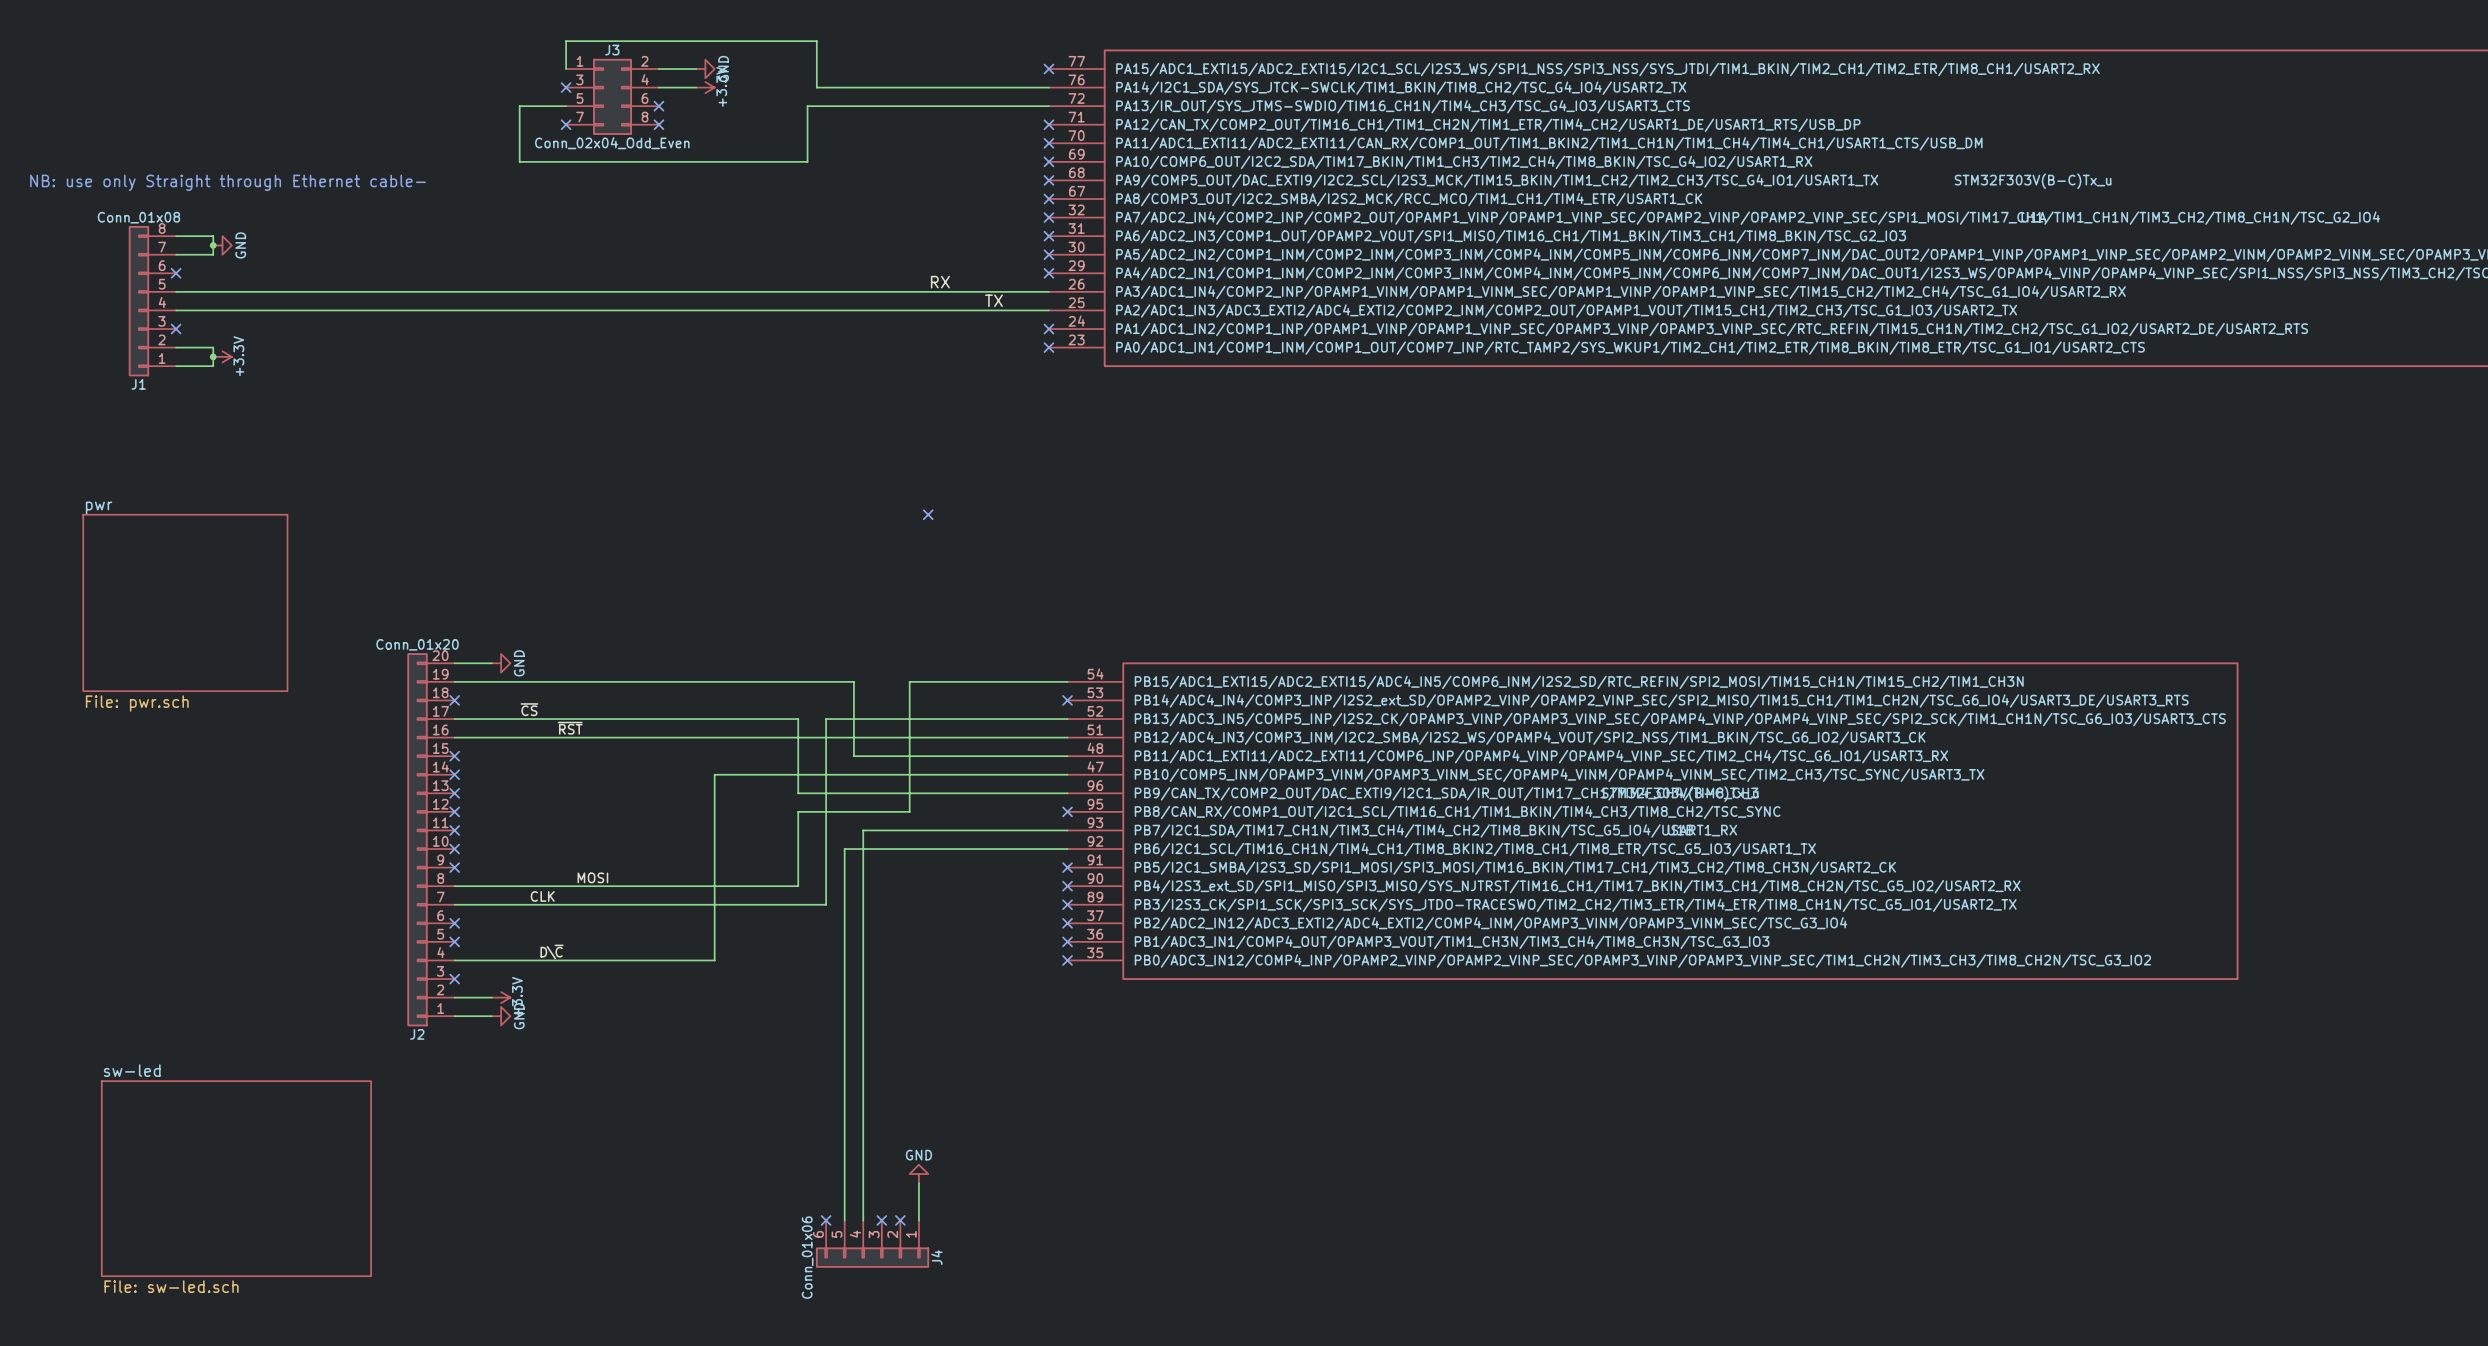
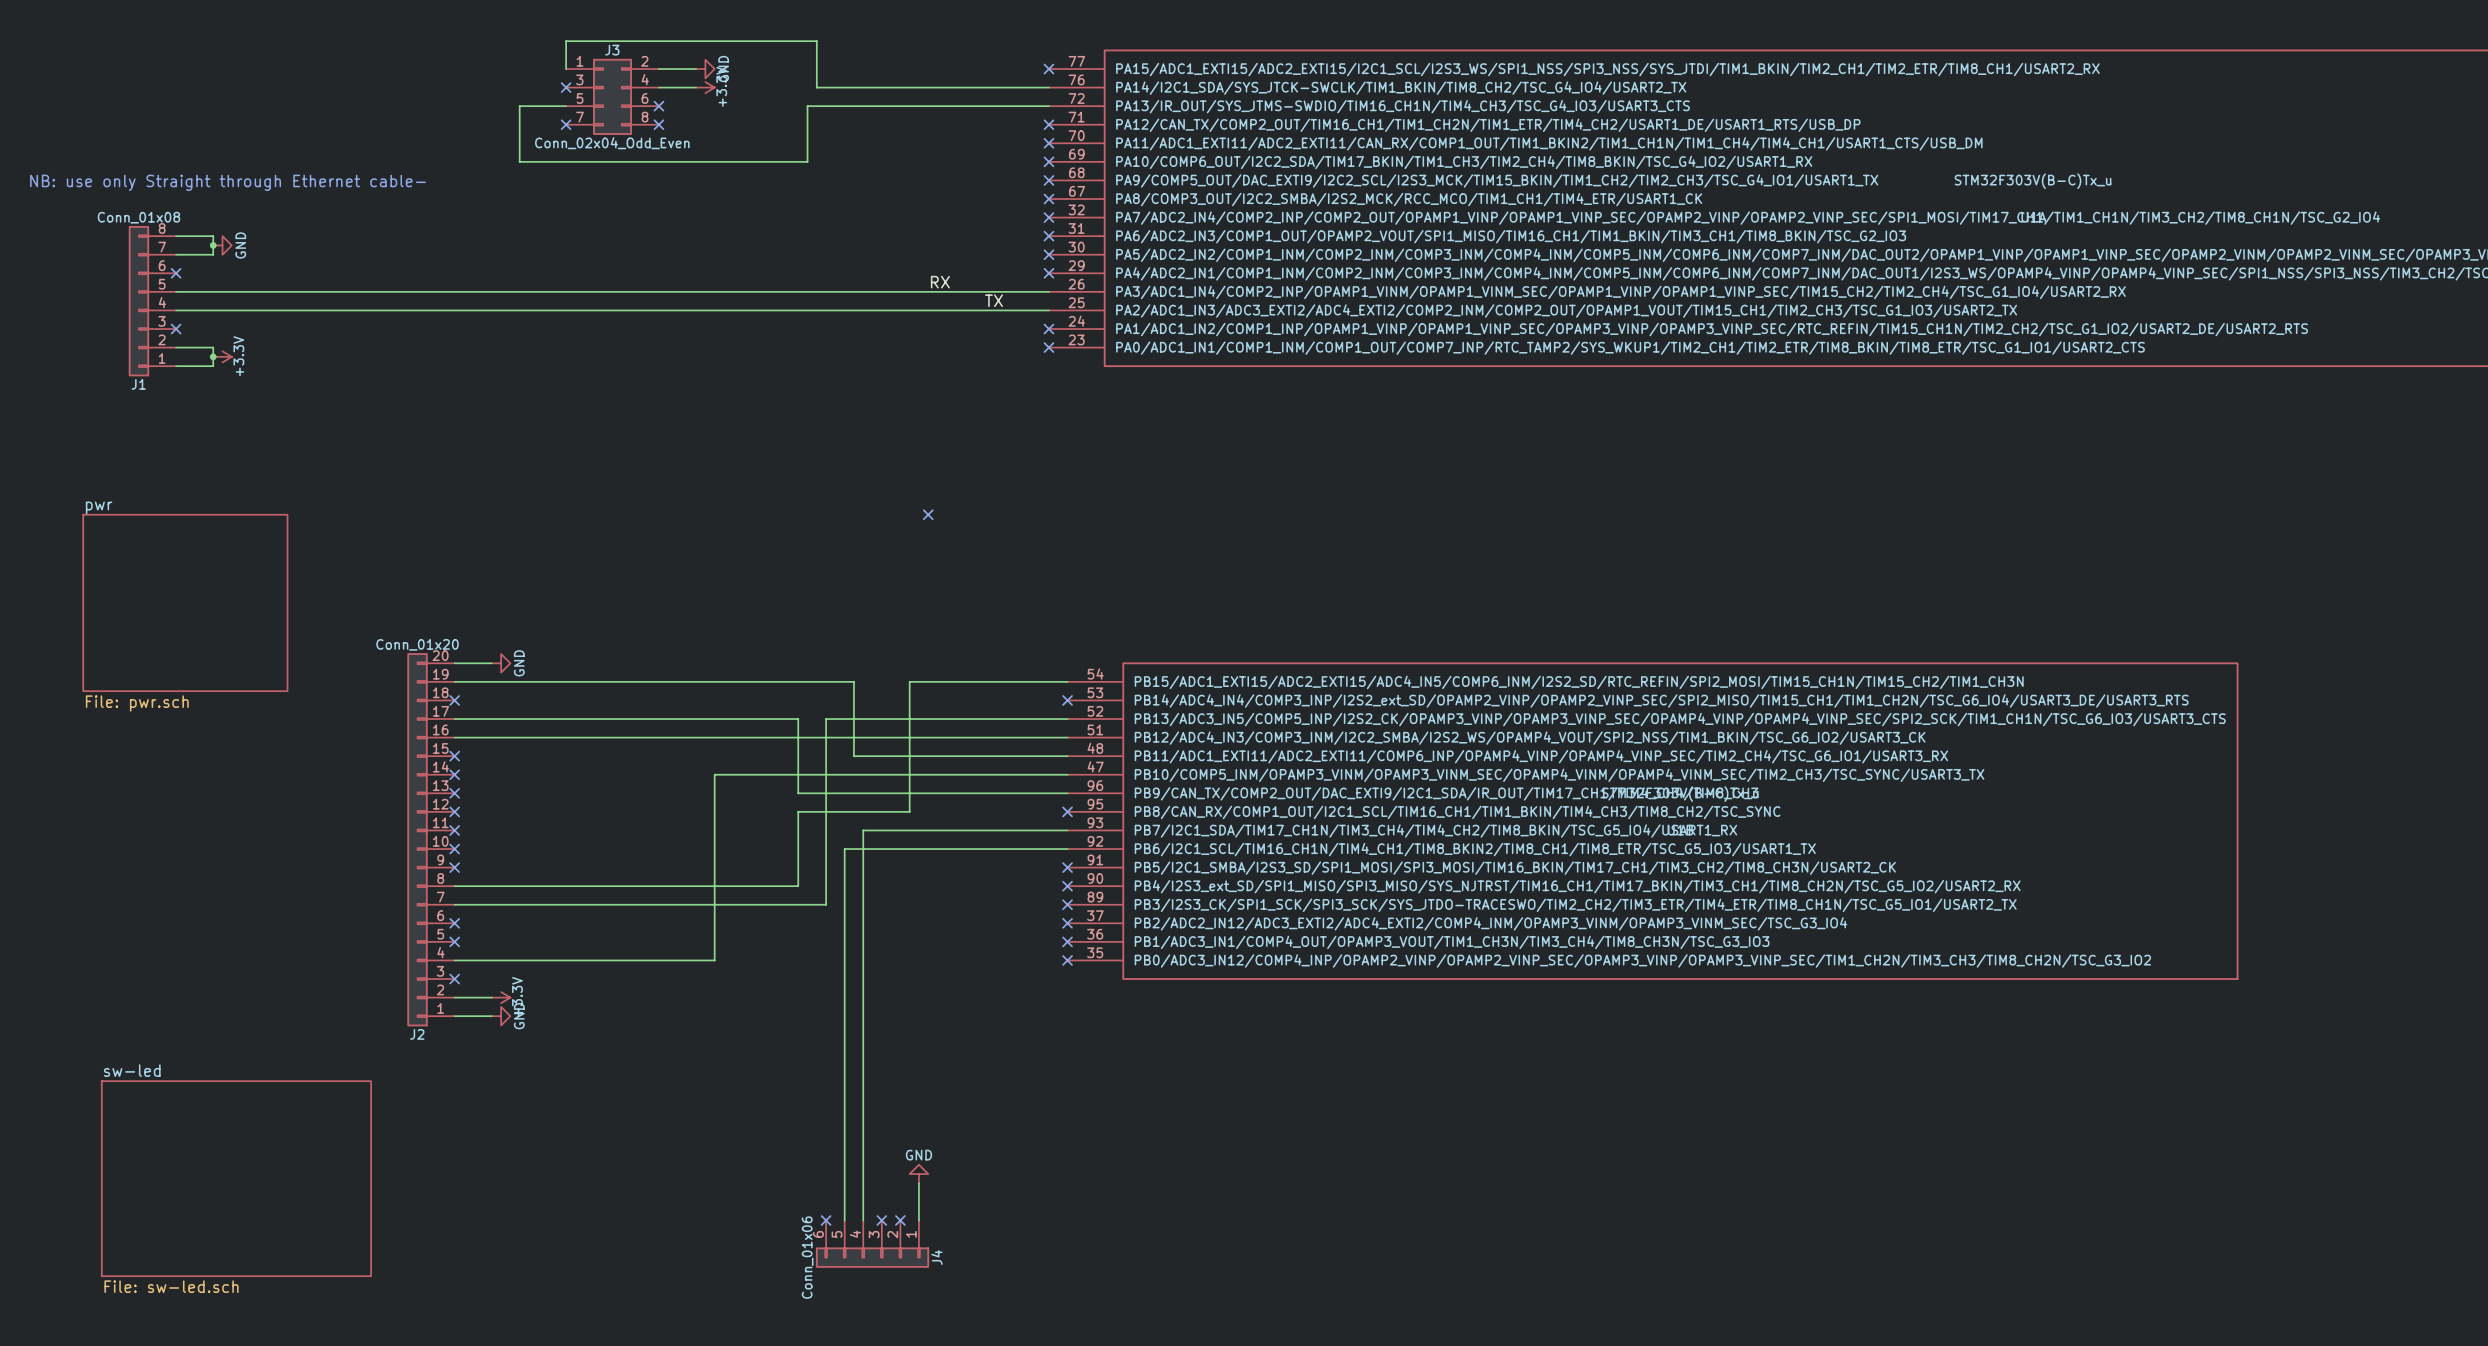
label: ~{CS} (529, 709) -> none
label: ~{RST} (570, 728) -> none
label: MOSI (592, 877) -> none
label: CLK (542, 896) -> none
label: D\~{C} (551, 951) -> none

